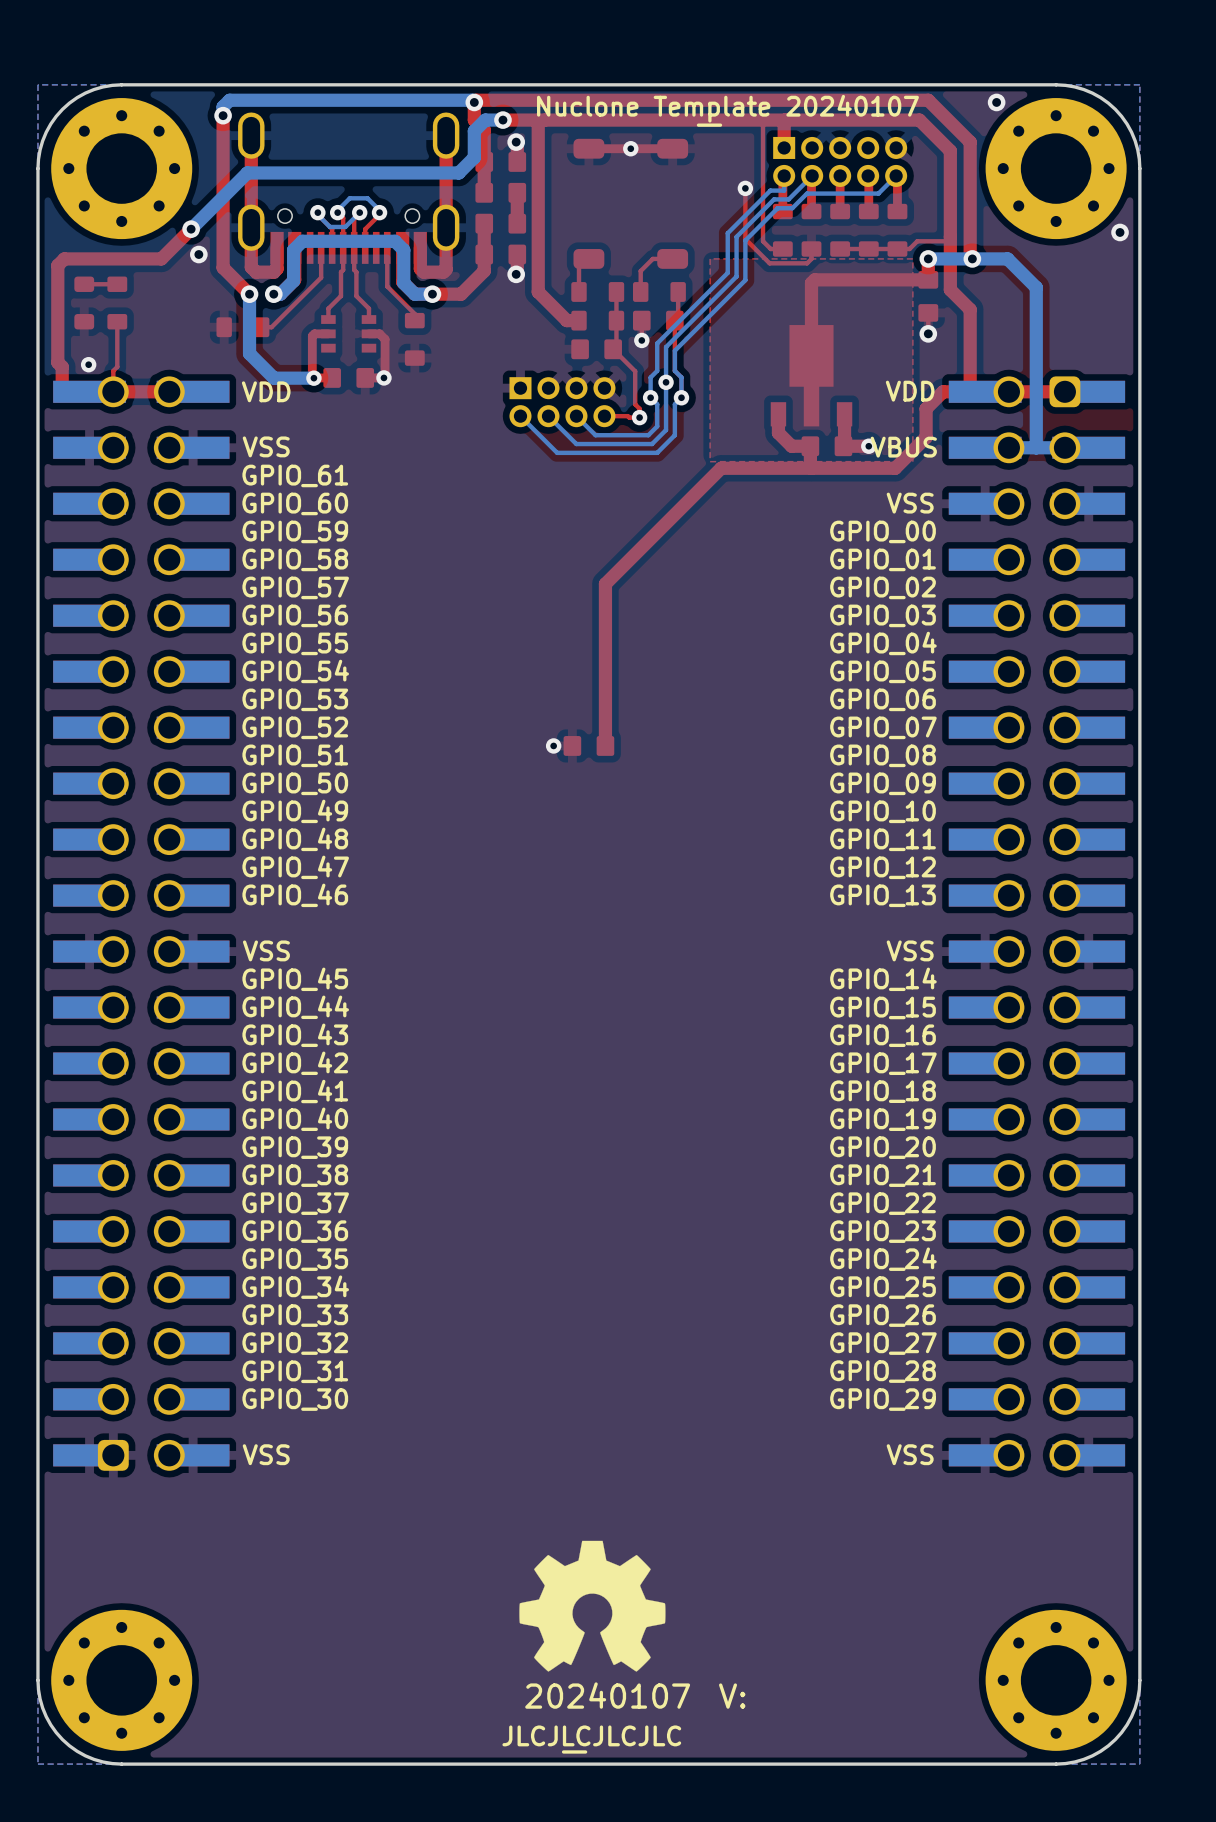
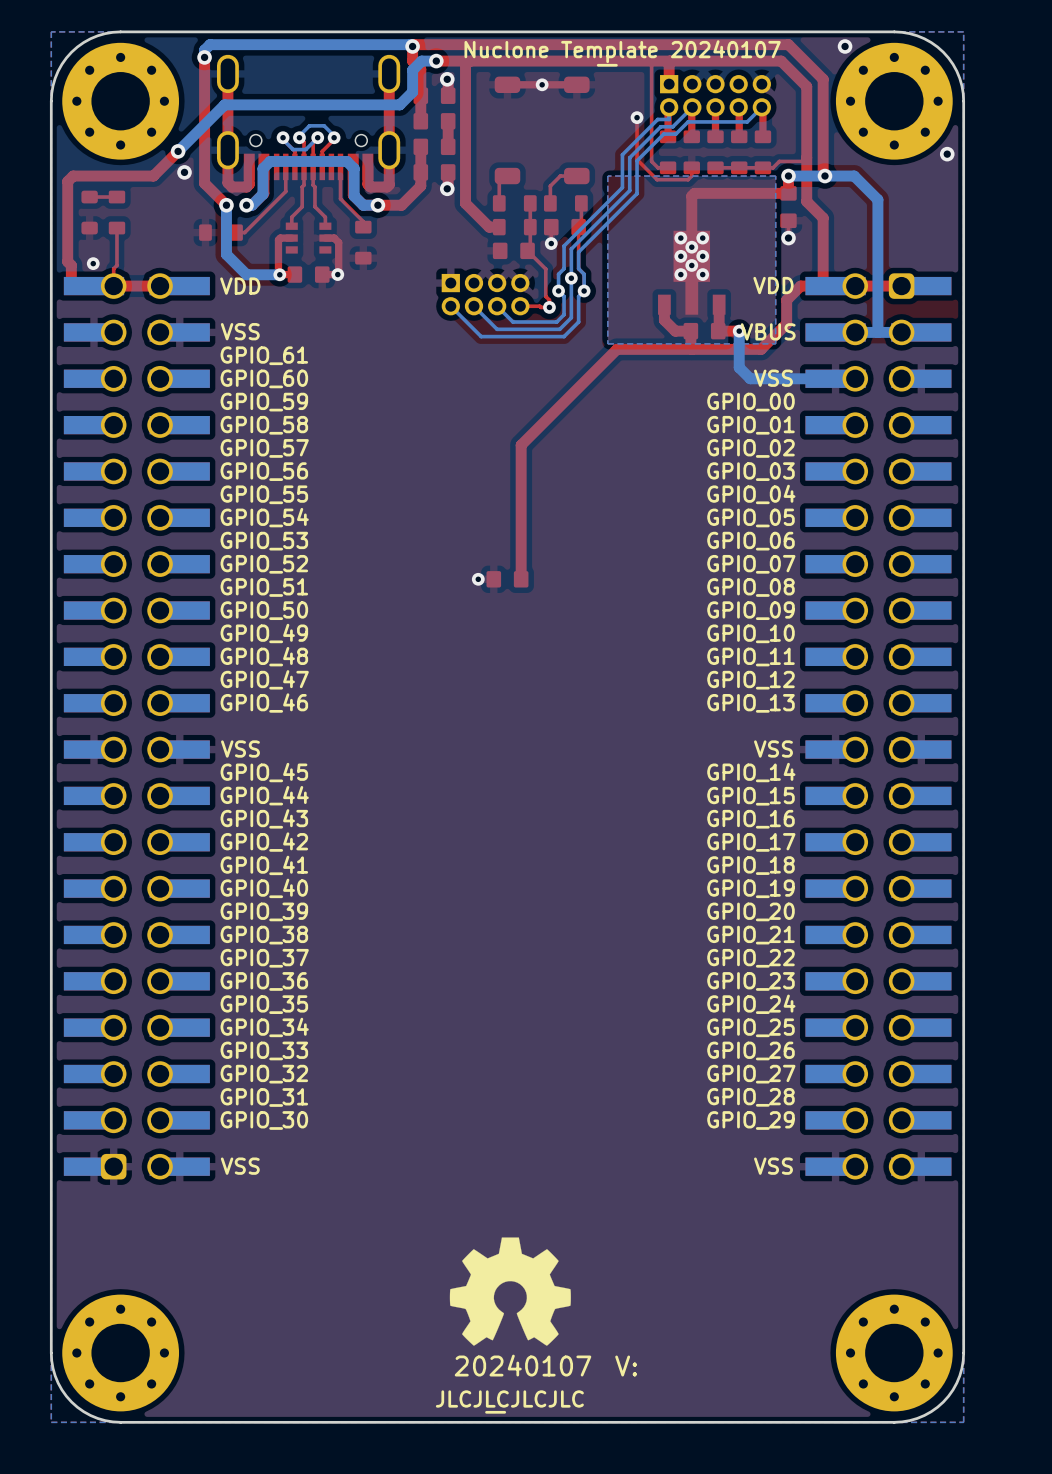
bottom zone outline: none -> (775, 176) (775, 343) (607, 343) (607, 176) (775, 176)
via: none -> (680, 238)
via: none -> (702, 238)
via: none -> (691, 247)
via: none -> (680, 256)
via: none -> (702, 256)
via: none -> (691, 265)
via: none -> (680, 274)
via: none -> (702, 274)
bottom track: none -> (739, 331) (739, 367) (750, 378) (855, 378)

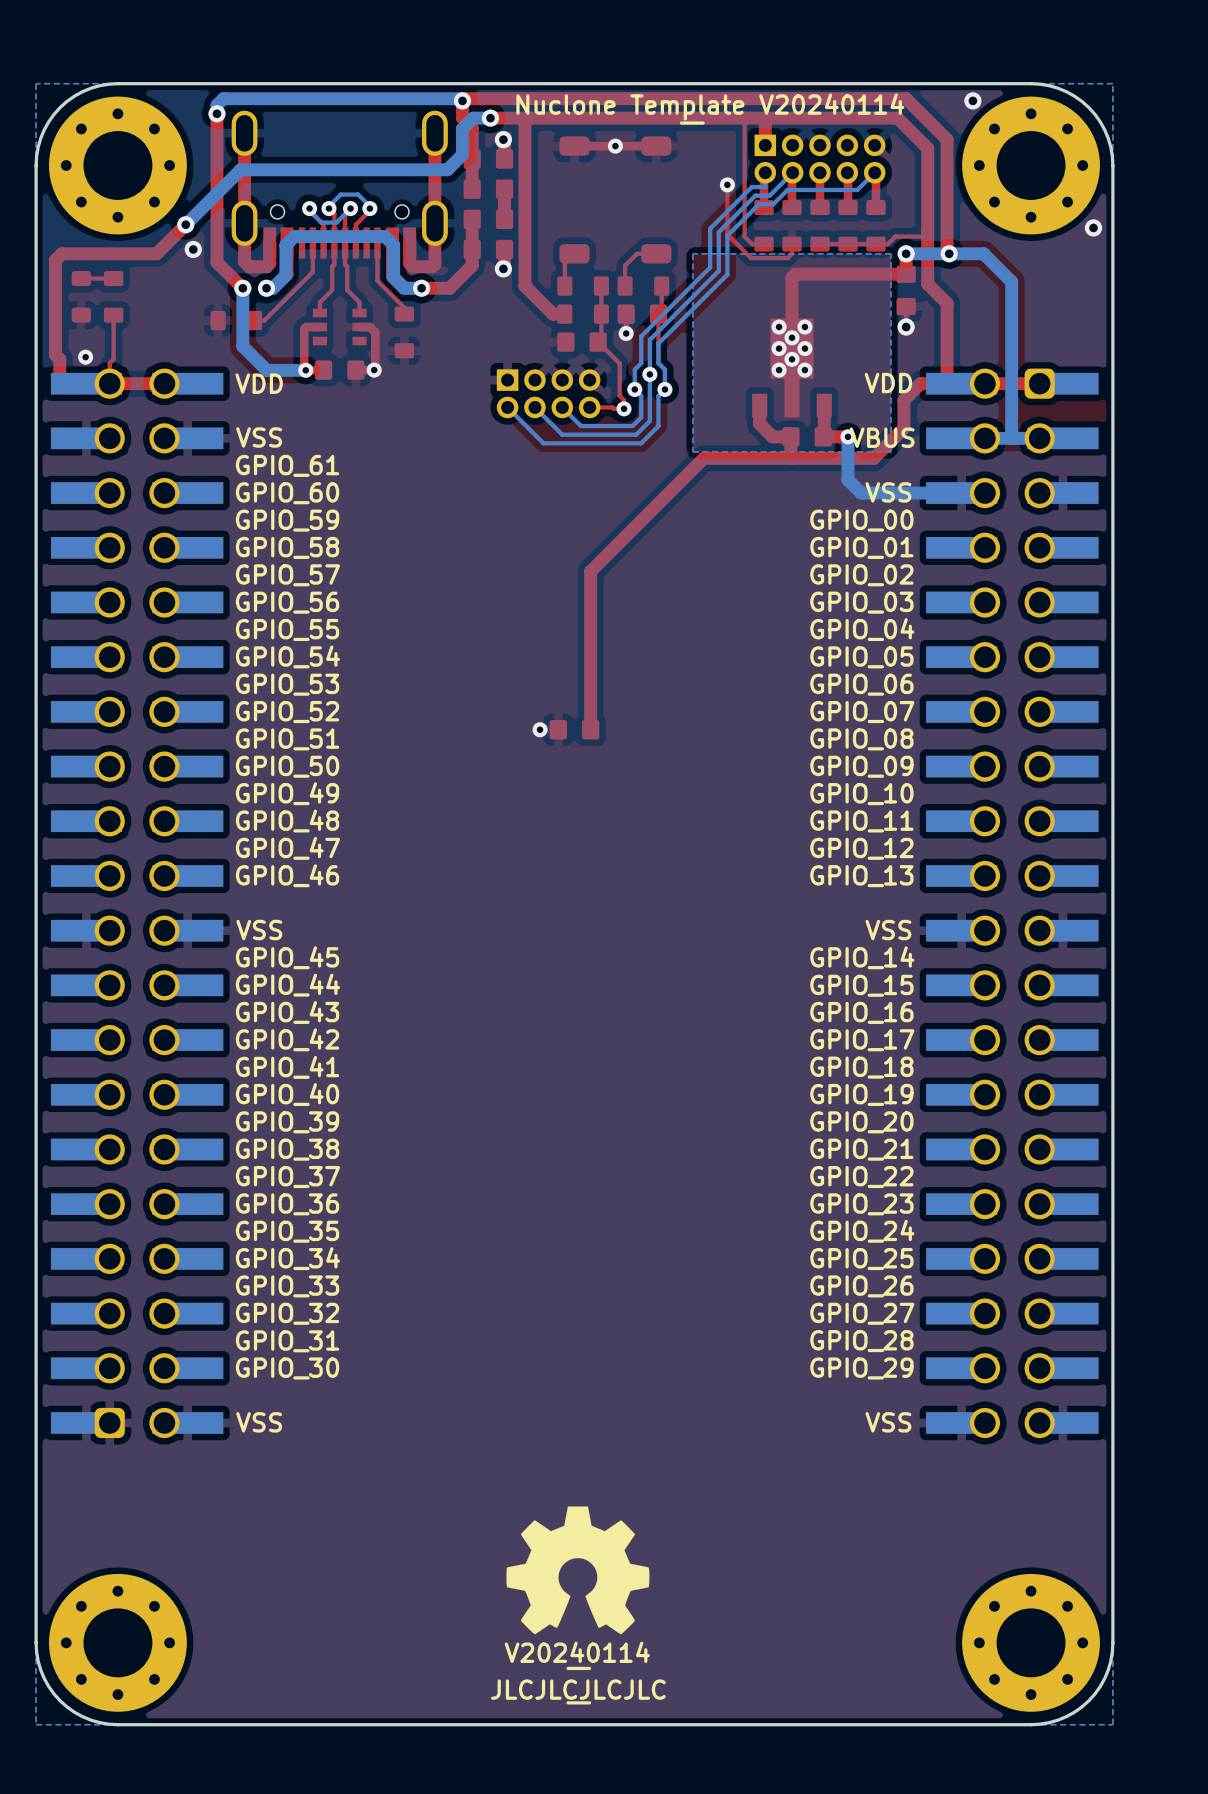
drawing shape: [464, 40, 781, 67] -> [516, 93, 905, 125]
drawing: [454, 1354, 638, 1377] -> none
drawing: none -> [566, 1666, 592, 1671]
drawing shape: [435, 1390, 584, 1414] -> [491, 1679, 666, 1705]

